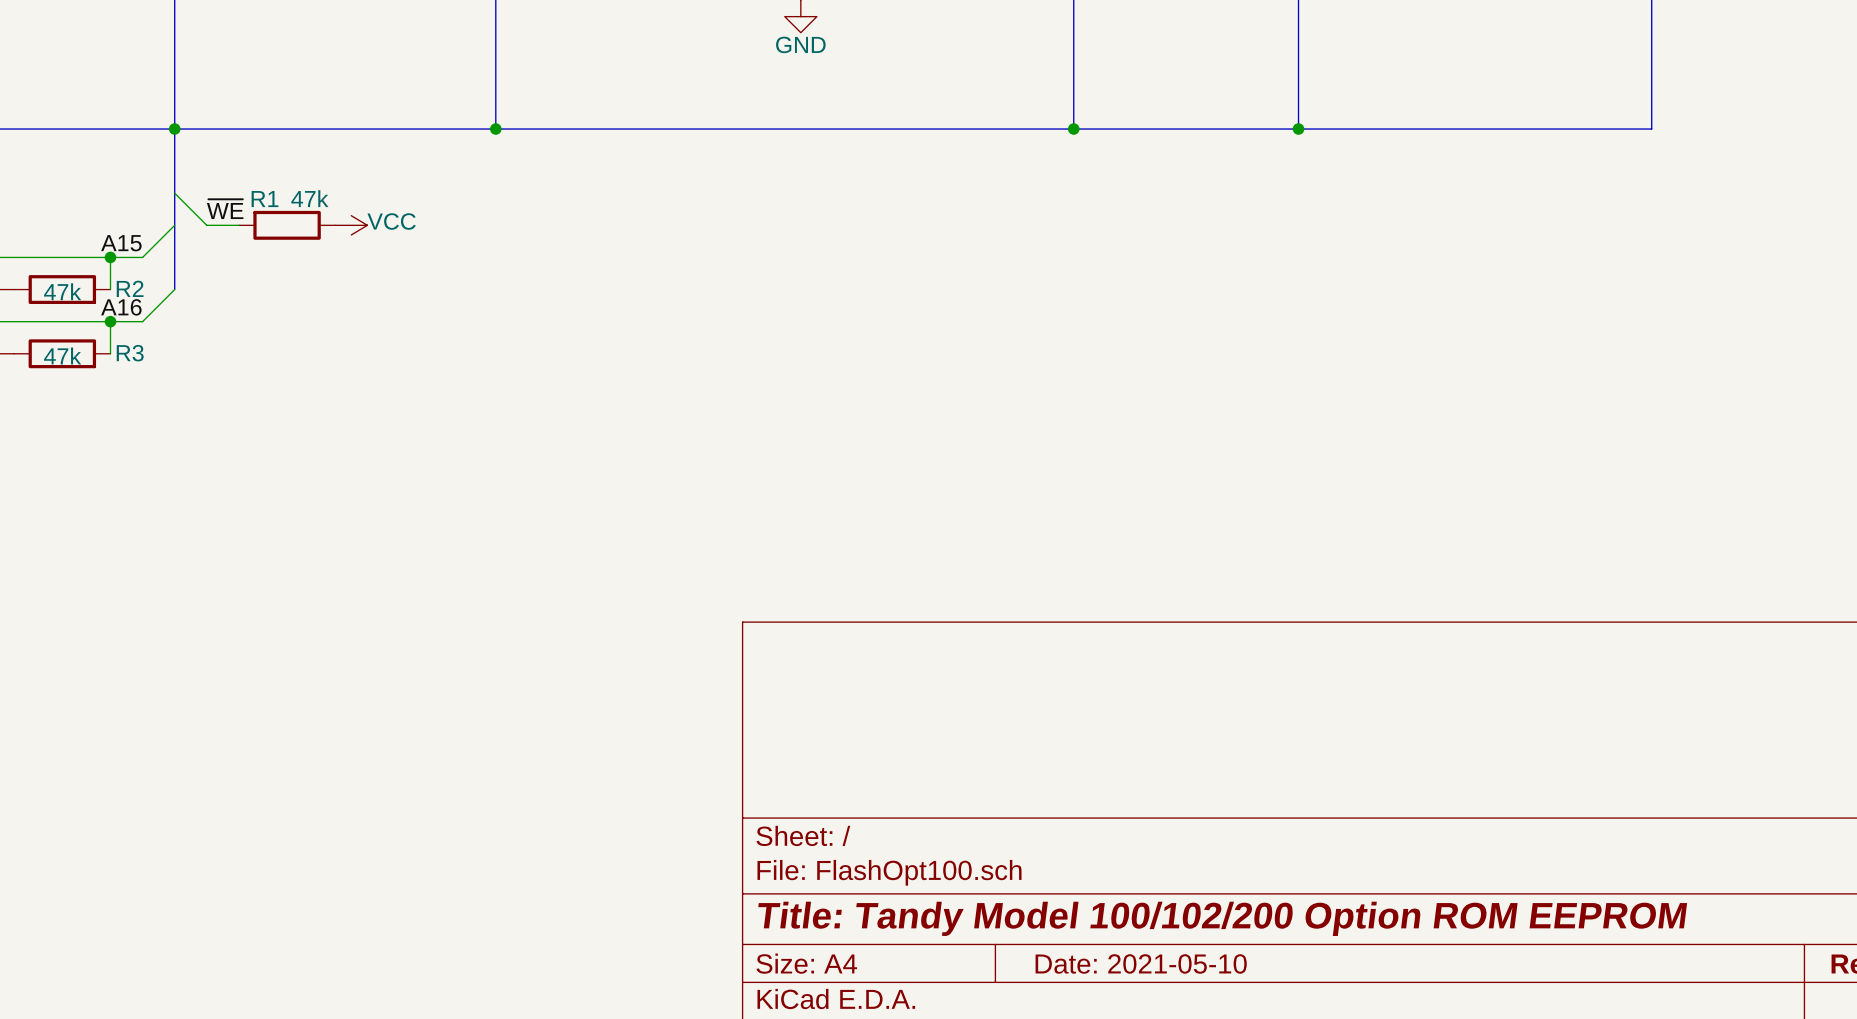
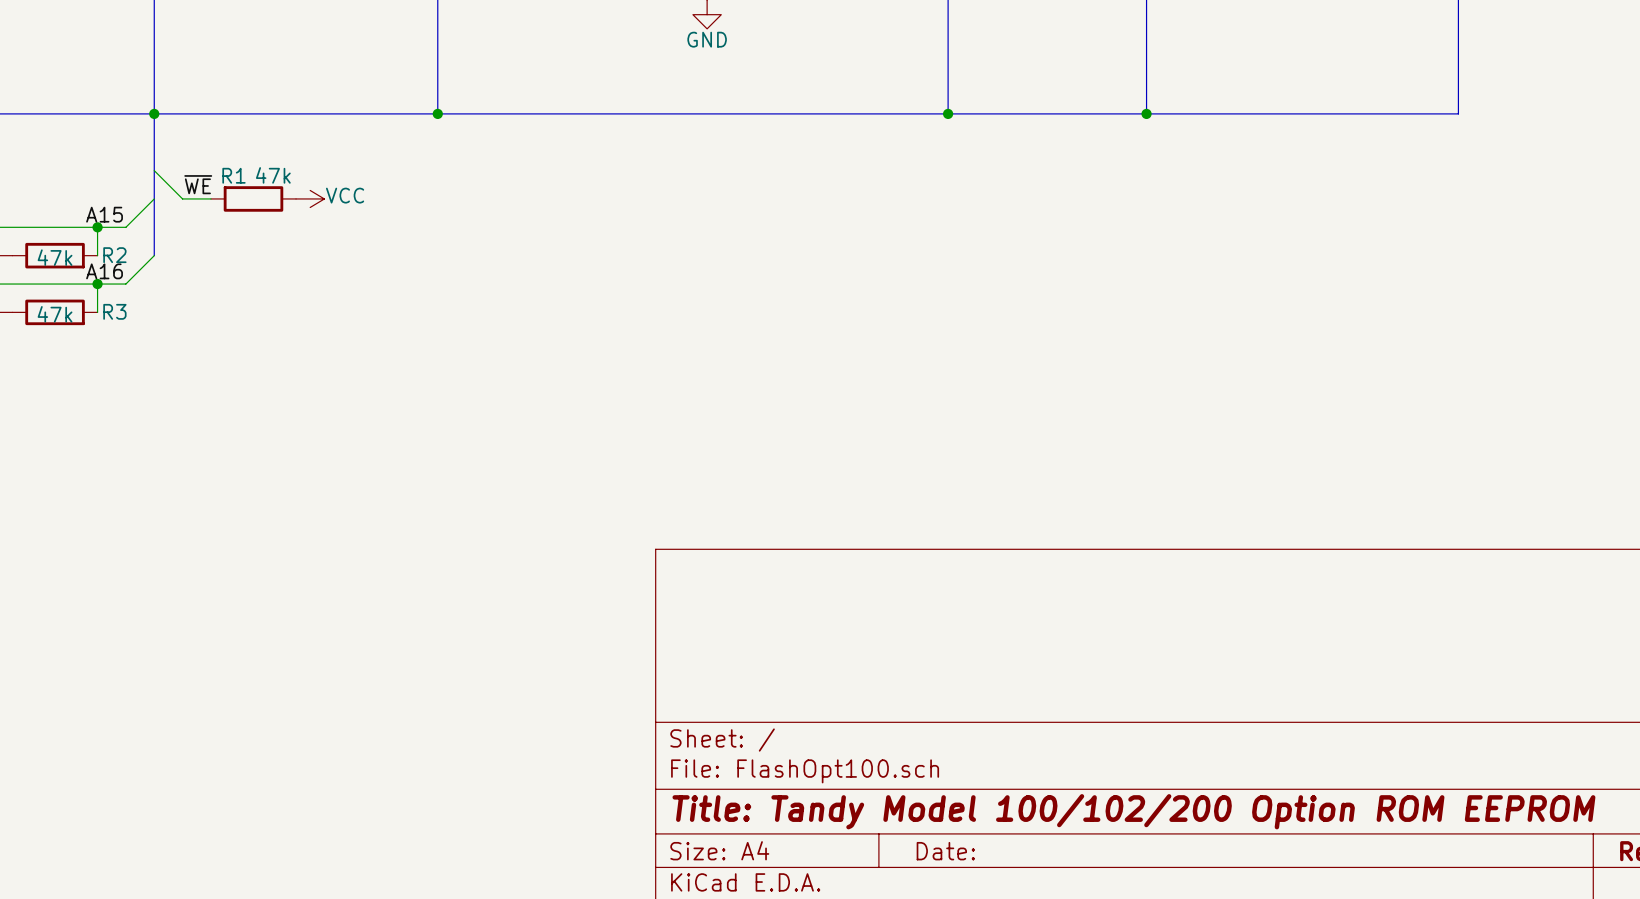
title block: Date: 2021-05-10 (1141, 963) -> Date: (945, 851)

